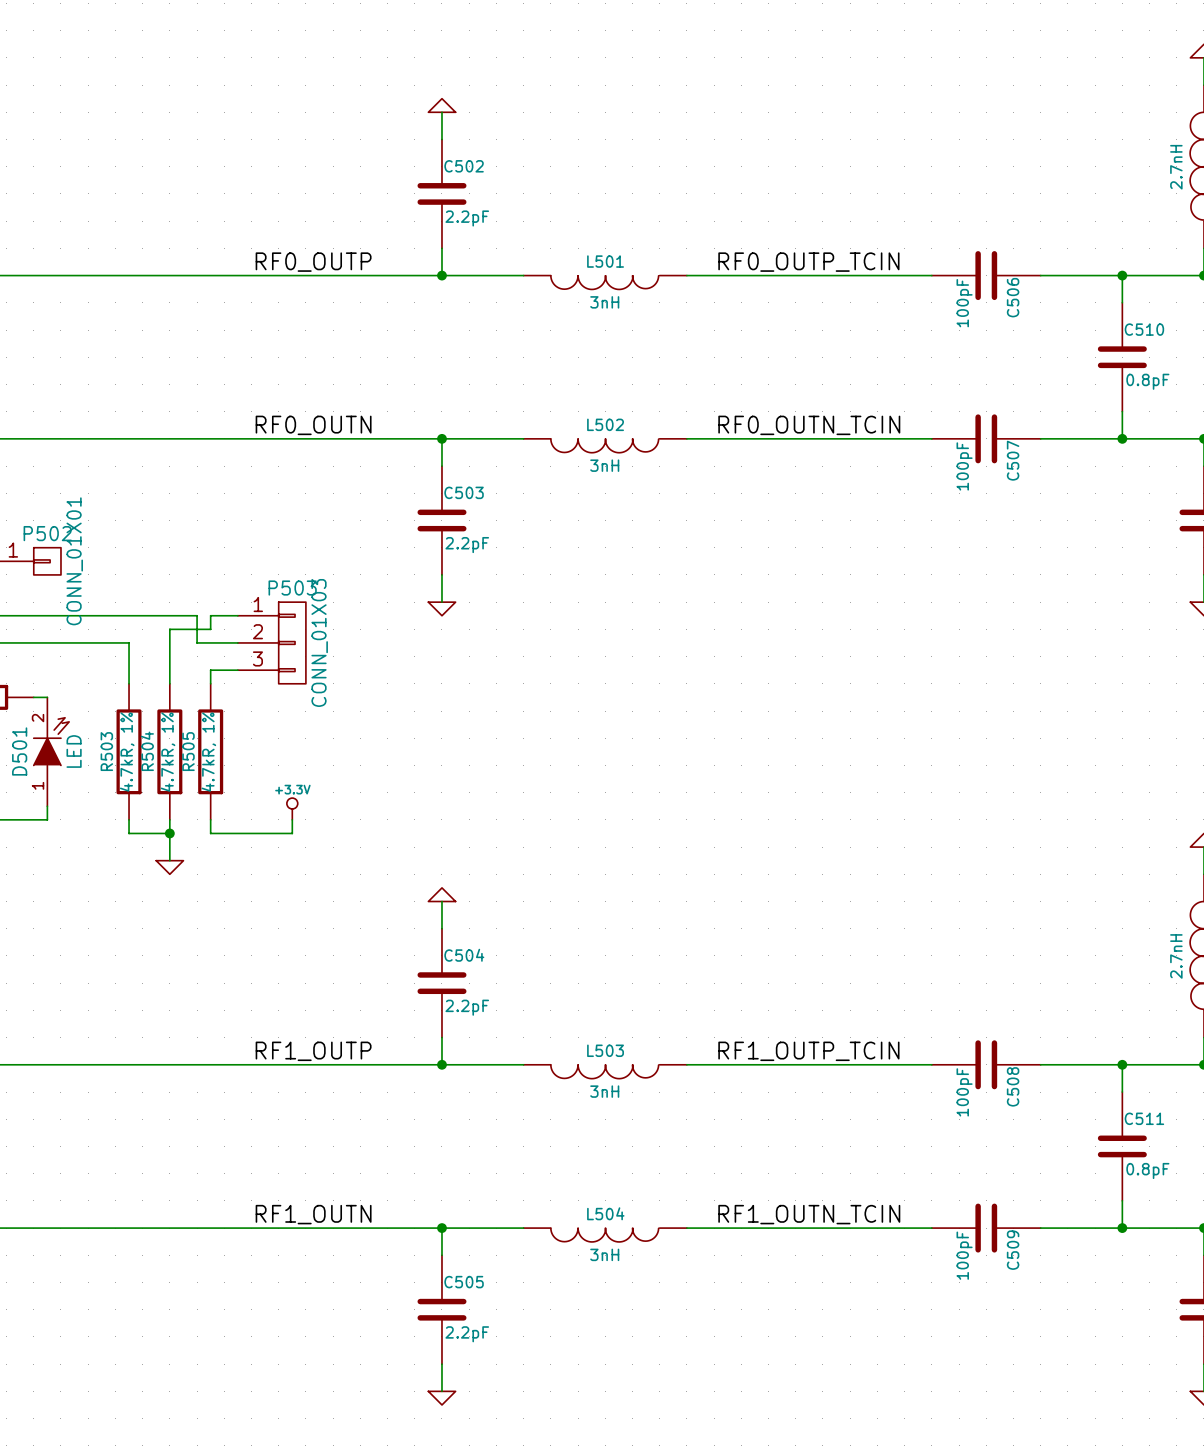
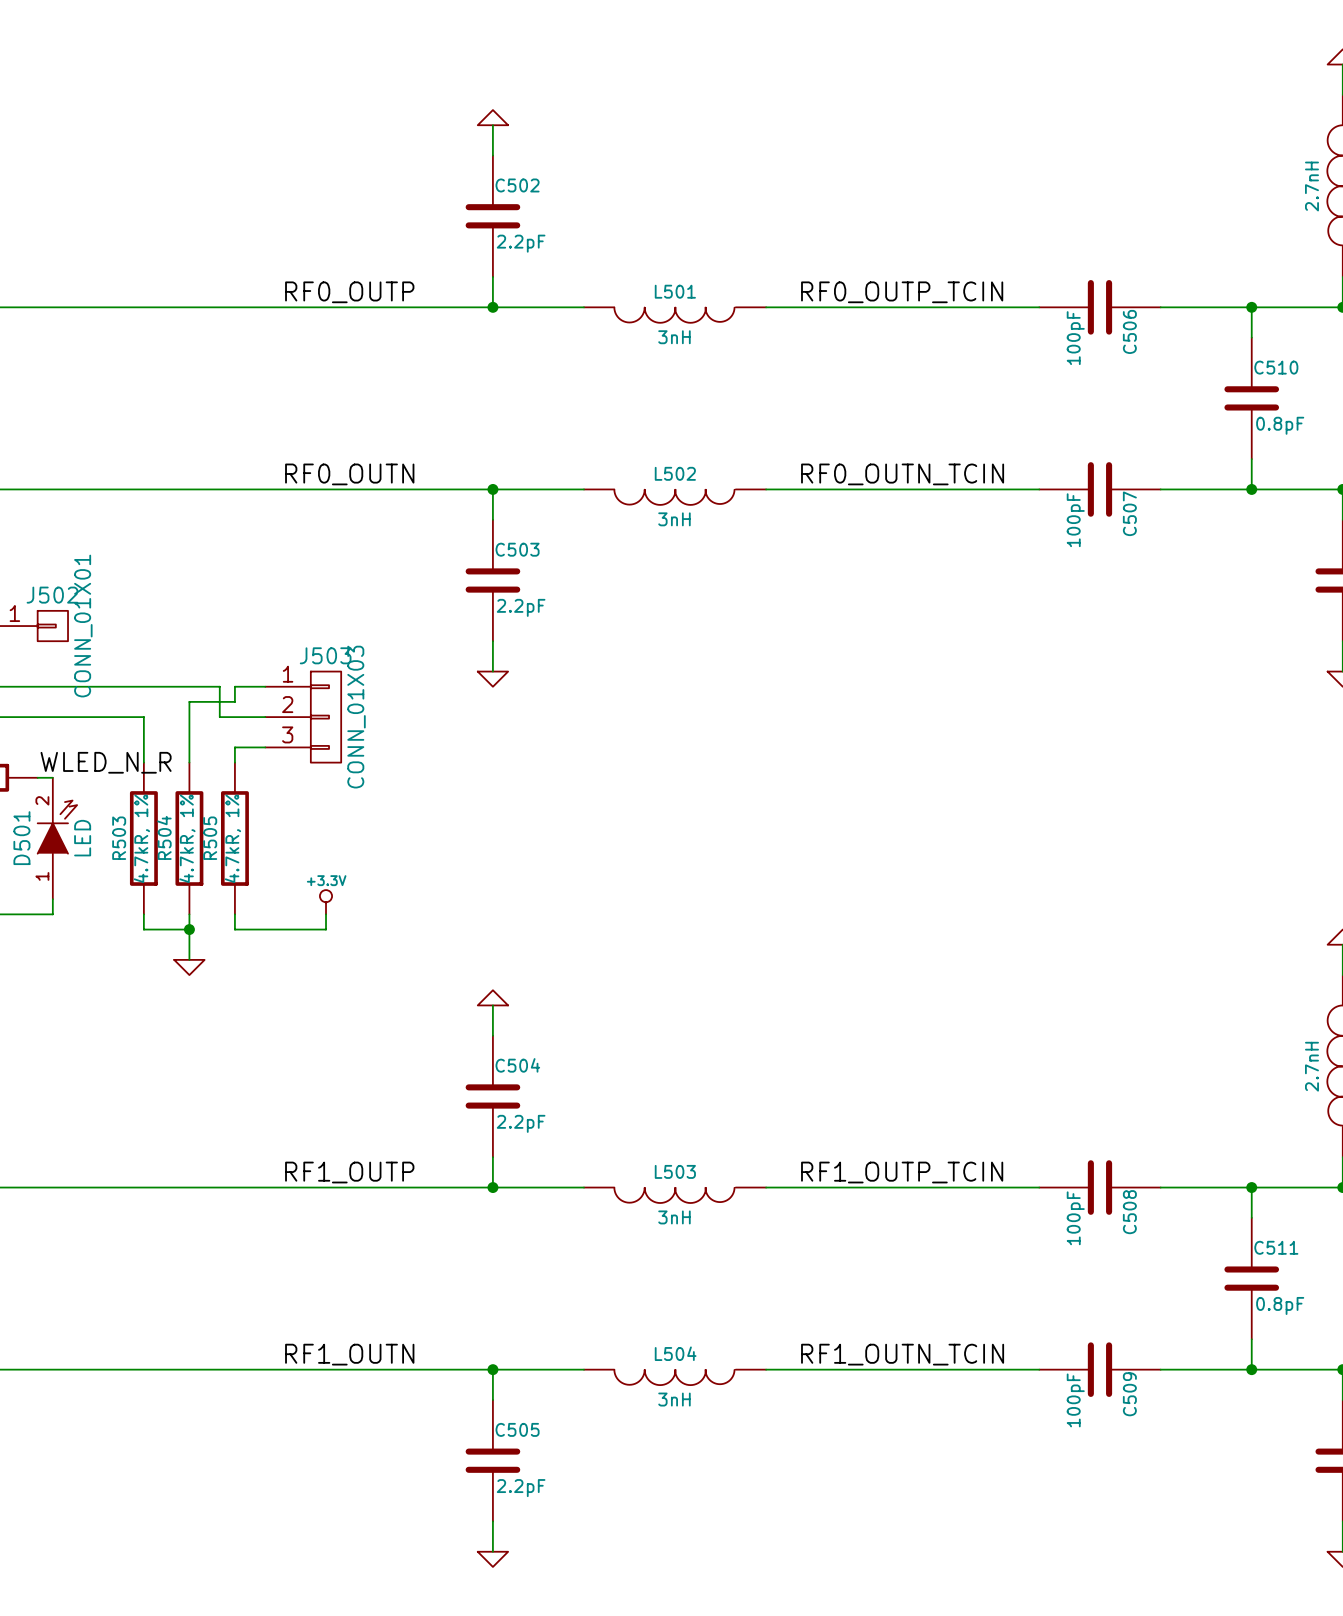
P502 name: P502 (47, 533) -> J502 (52, 595)
P503 name: P503 (292, 588) -> J503 (325, 655)
label: none -> WLED_N_R (106, 762)

